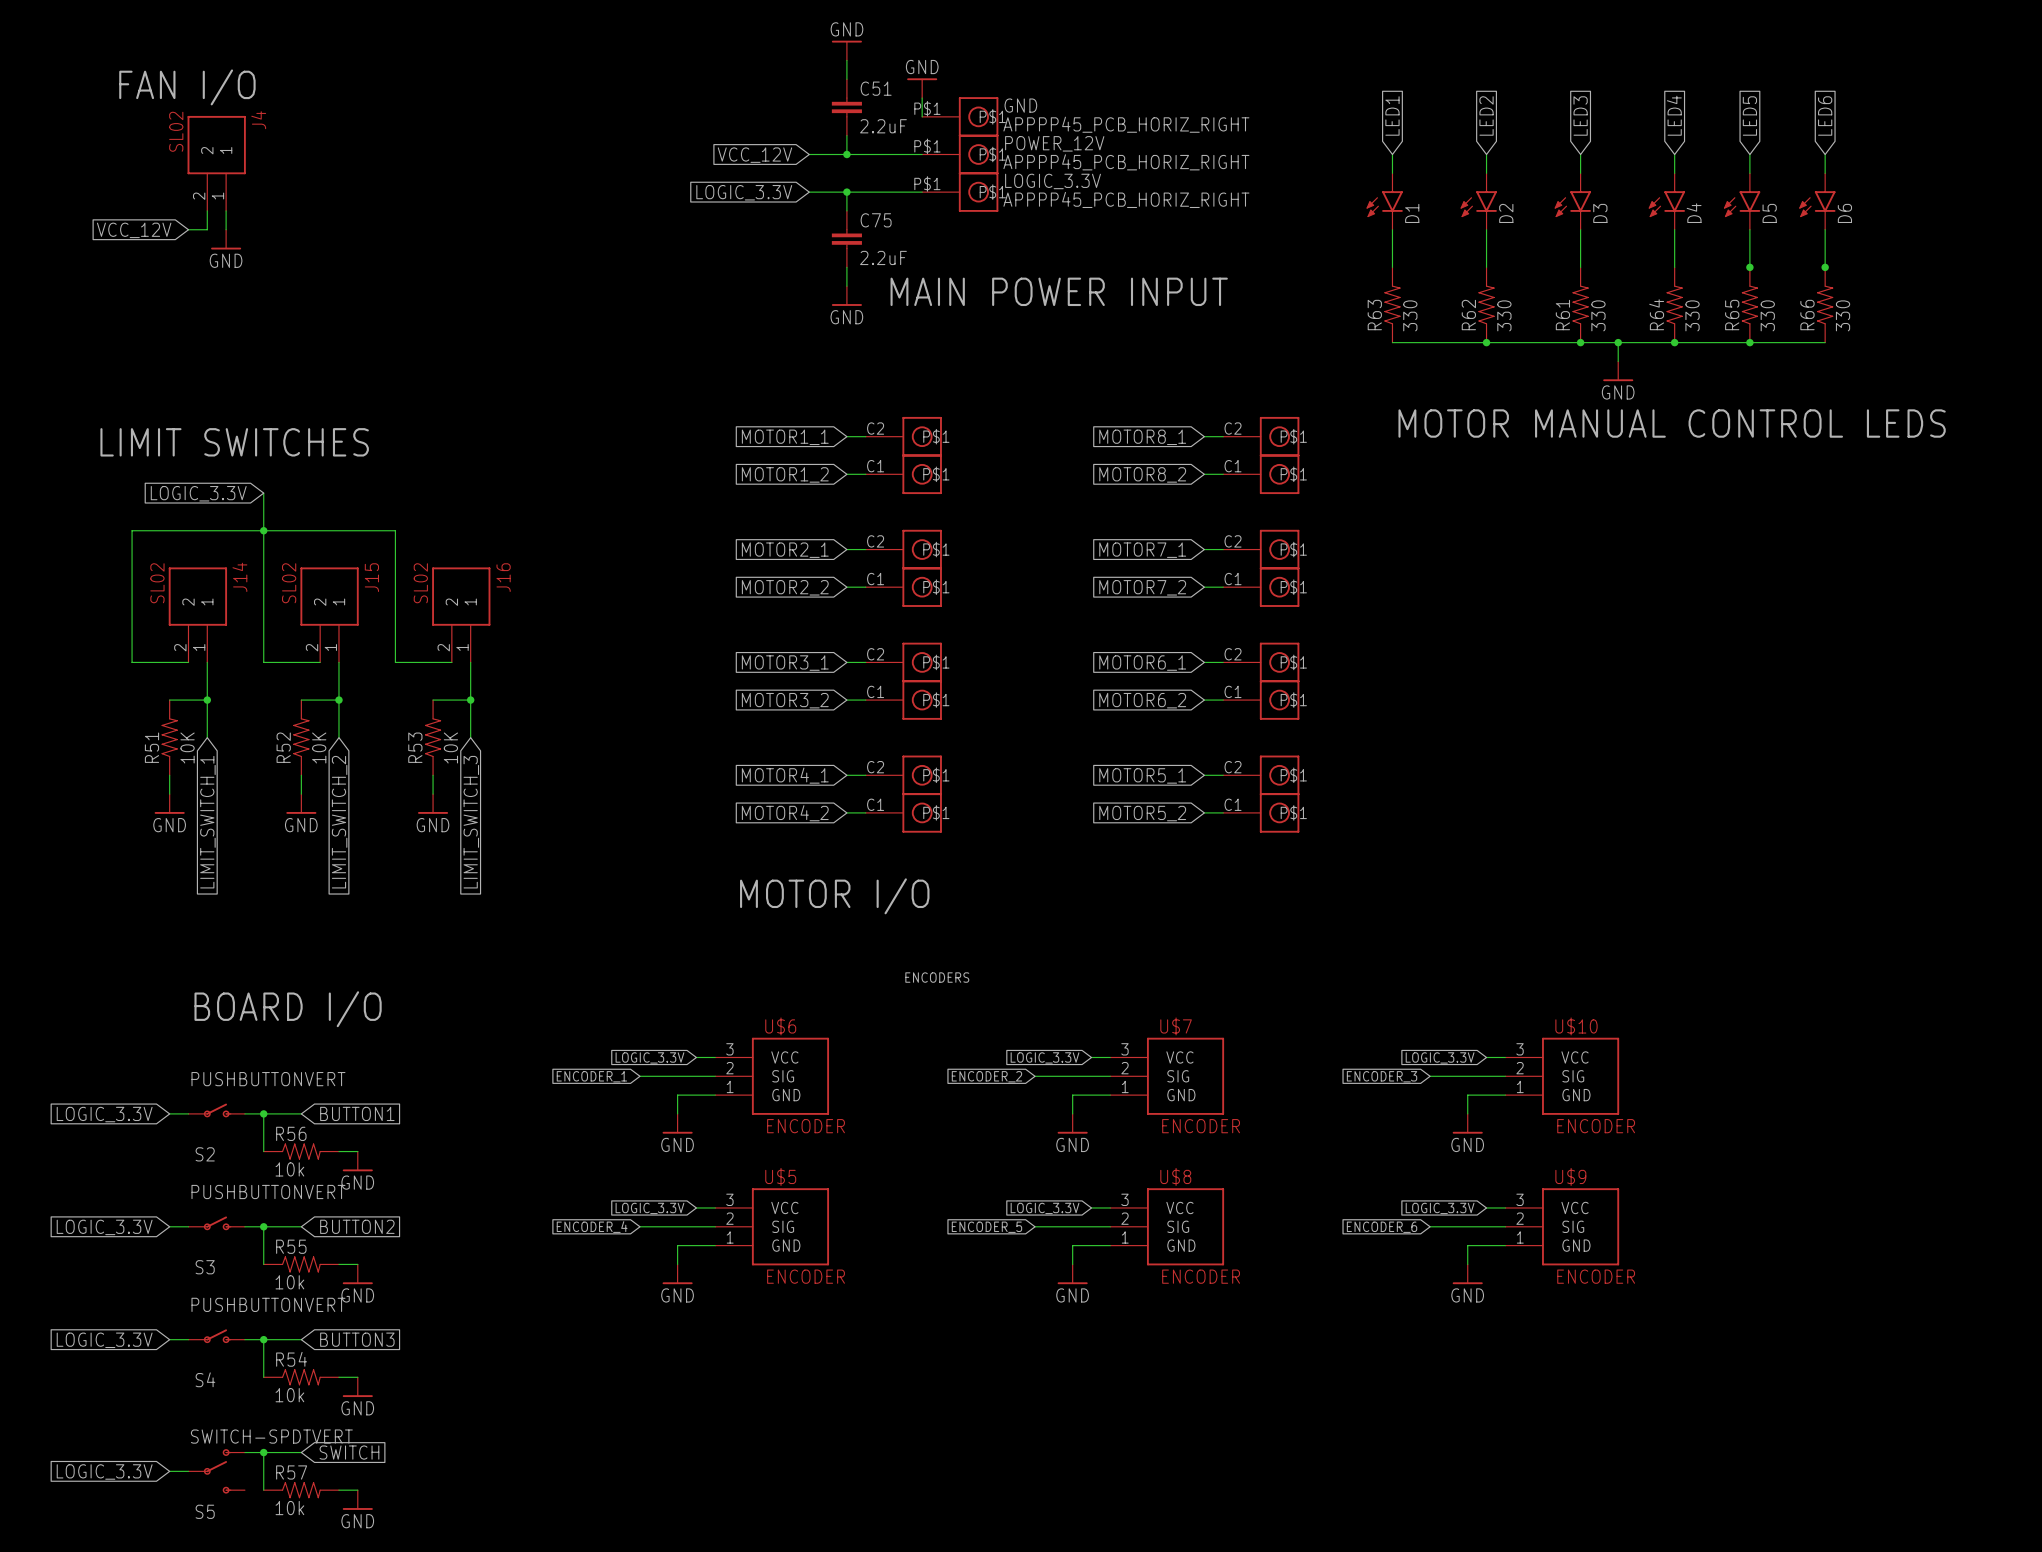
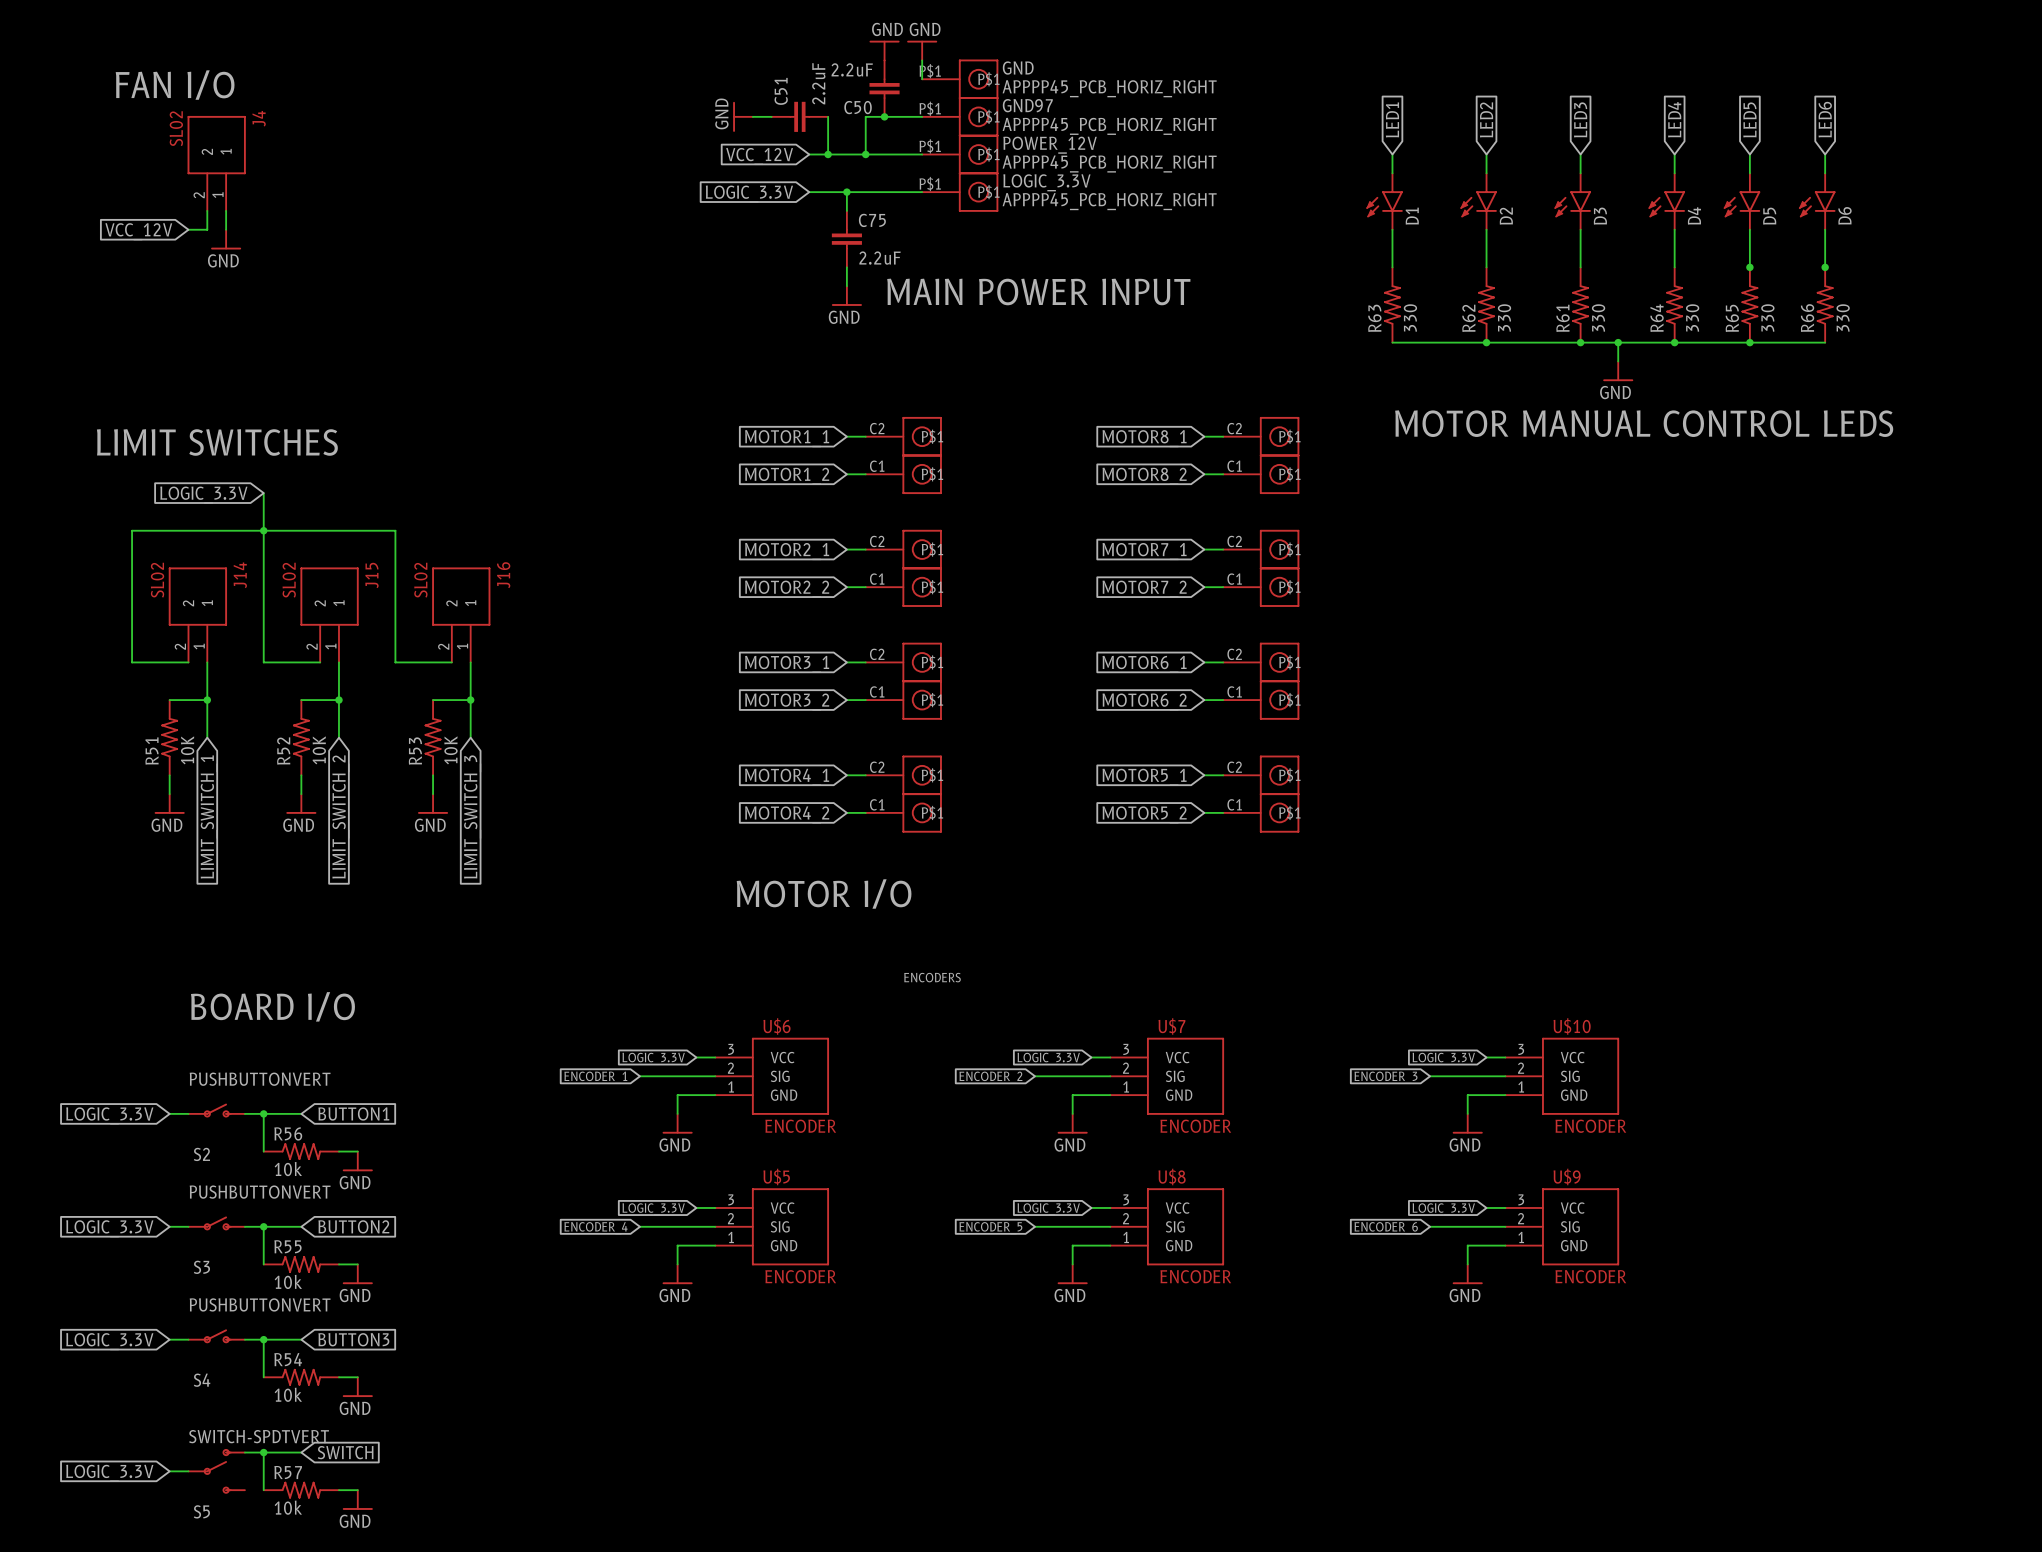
power symbol: GND (846, 50) -> none
power symbol: none -> GND (884, 50)
power symbol: none -> GND (922, 50)
GND: none -> APPPP45_PCB_HORIZ_RIGHT (960, 79)
C51 name position: C51 (876, 88) -> C51 (781, 91)
C50: none -> 2.2uF (884, 88)
power symbol: GND (922, 88) -> none
wire: (922, 98) (922, 116) -> (865, 154) (865, 116) (922, 116)
GND name: GND (1020, 105) -> GND97 (1027, 105)
C51 rotation: 0° (846, 107) -> 90° clockwise (799, 116)
C51 position: (846, 107) -> (799, 116)
power symbol: none -> GND (742, 116)
wire: none -> (752, 116) (771, 116)
wire: none -> (828, 116) (828, 154)
junction: none -> (884, 116)
C51 value position: 2.2uF (883, 126) -> 2.2uF (818, 83)
wire: (846, 135) (846, 154) -> none
junction: none -> (828, 154)
junction: (846, 154) -> none
junction: none -> (865, 154)

